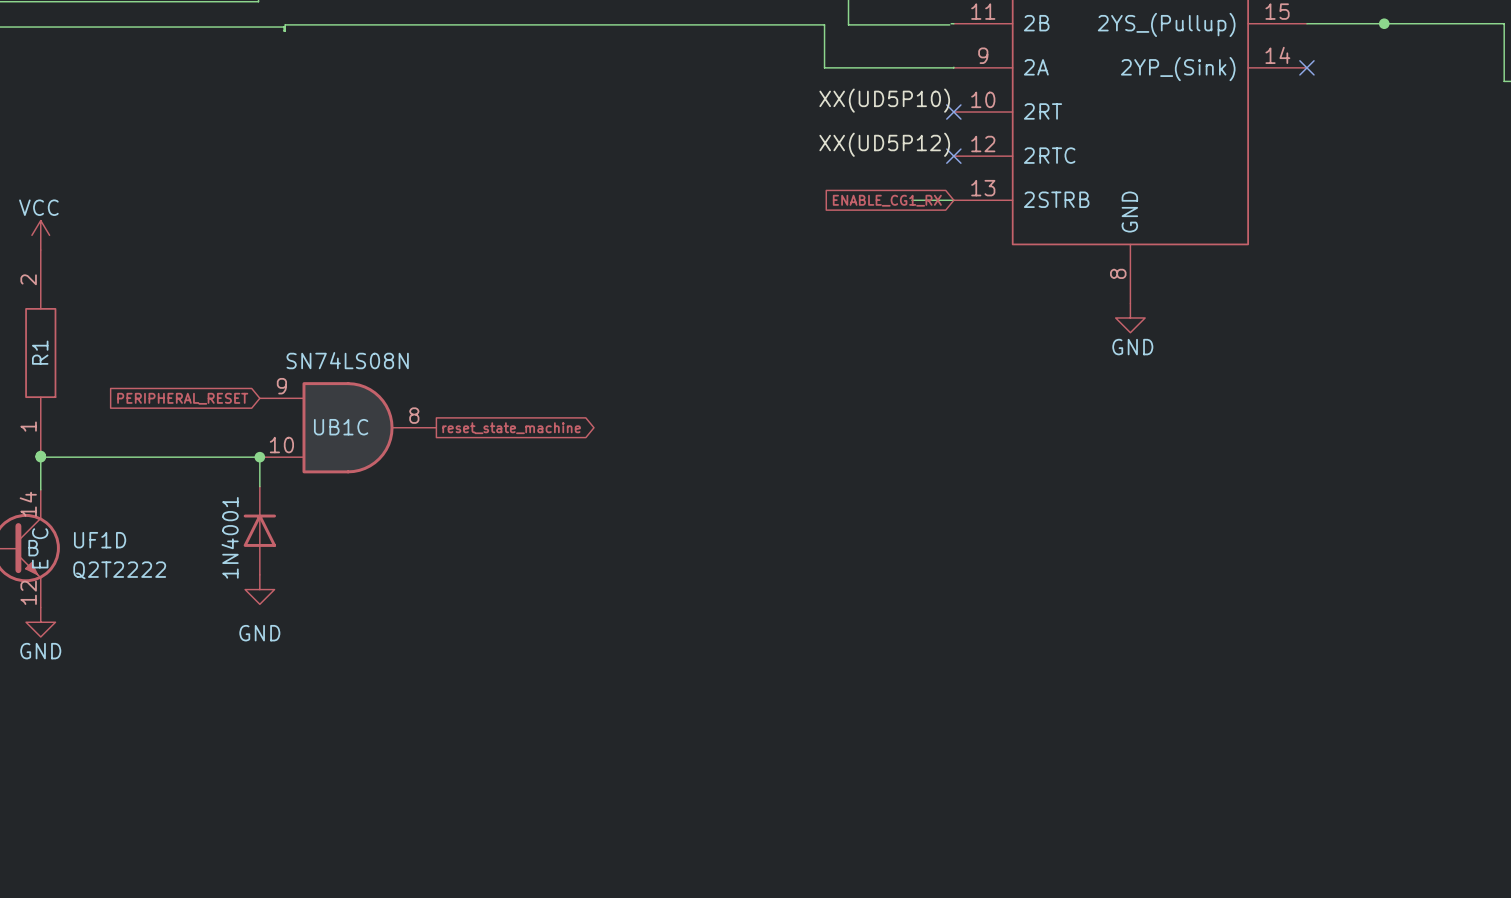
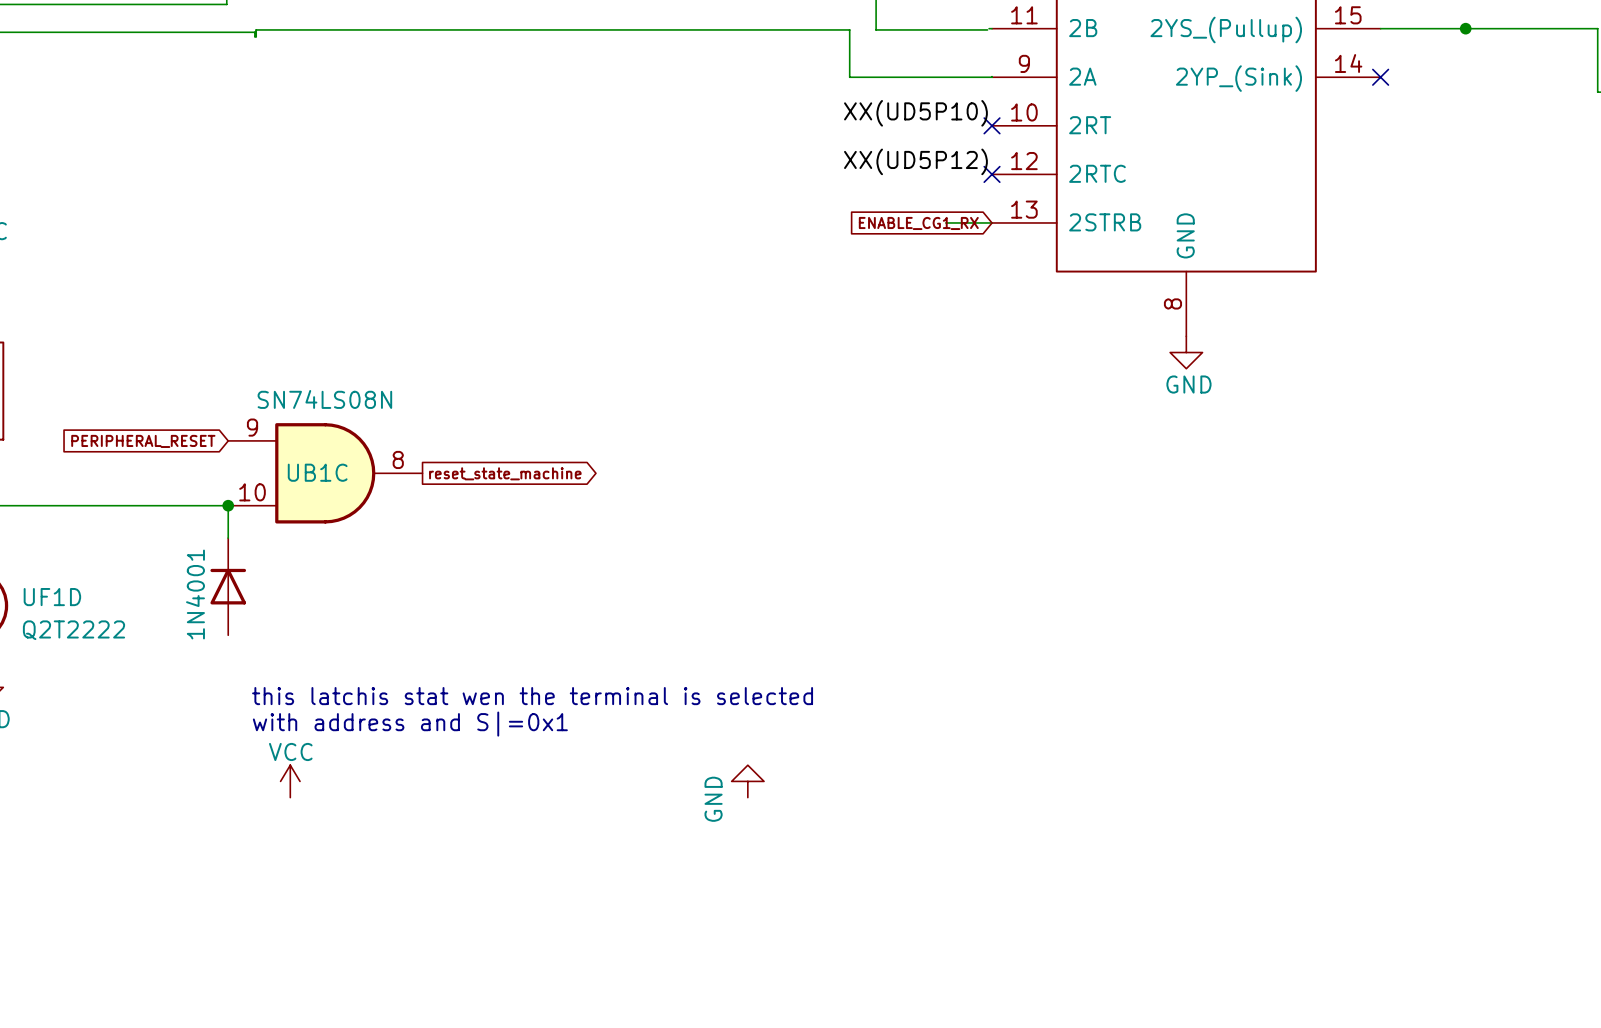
power symbol: GND (259, 589) -> none
text: none -> this latchis stat wen the terminal is selected (532, 696)
text: none -> with address and S|=0x1 (410, 724)
power symbol: none -> VCC (290, 781)
power symbol: none -> GND (747, 781)

